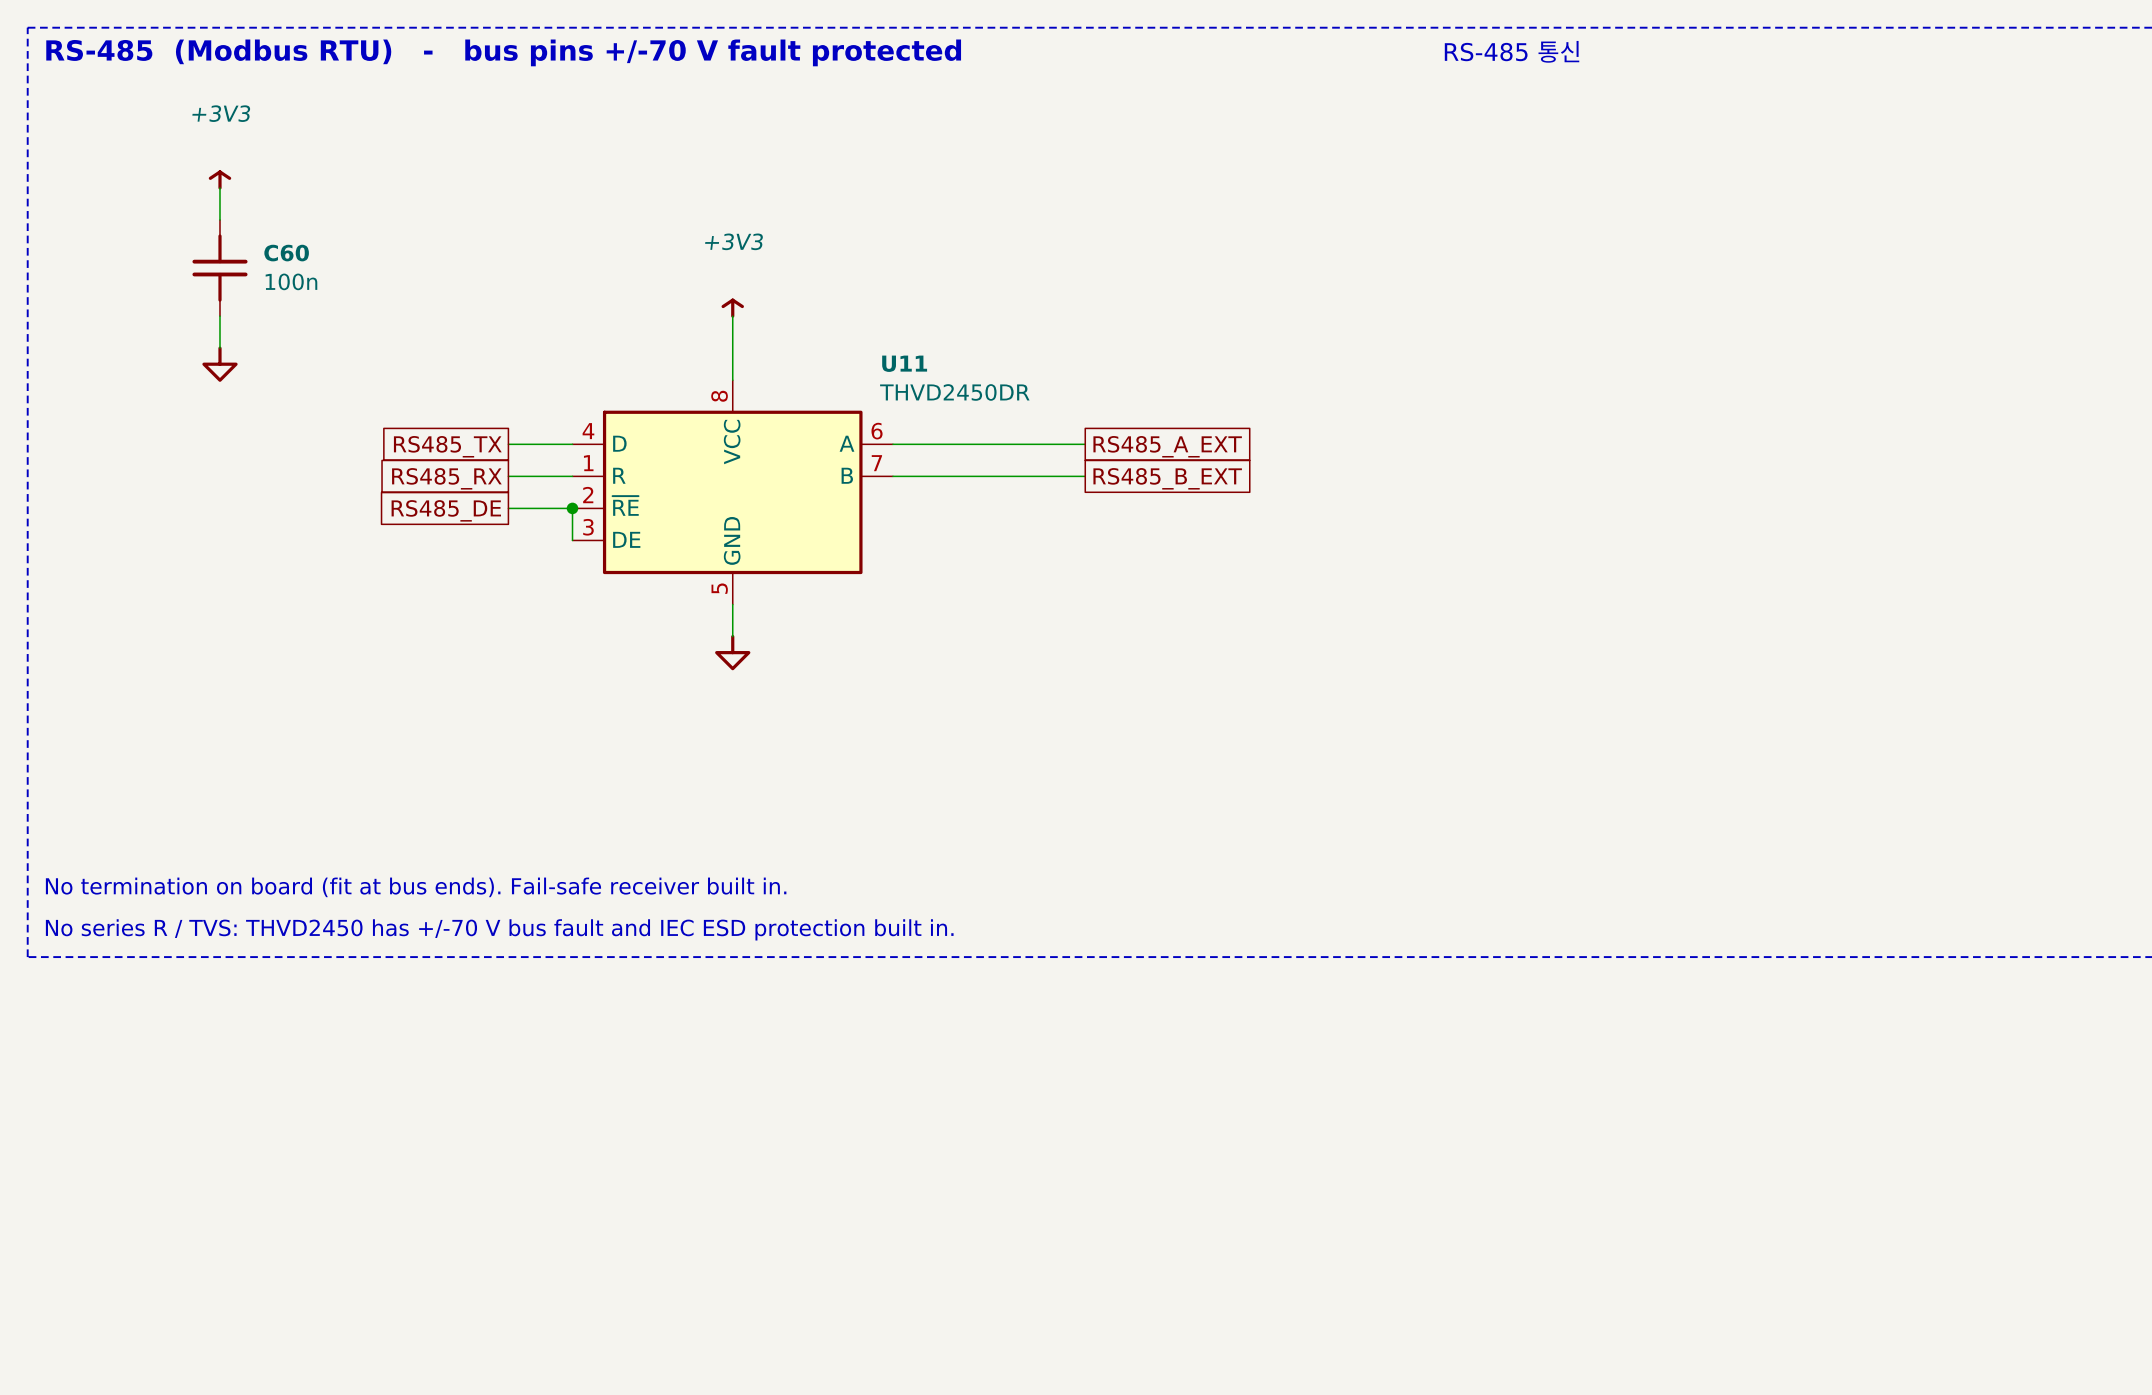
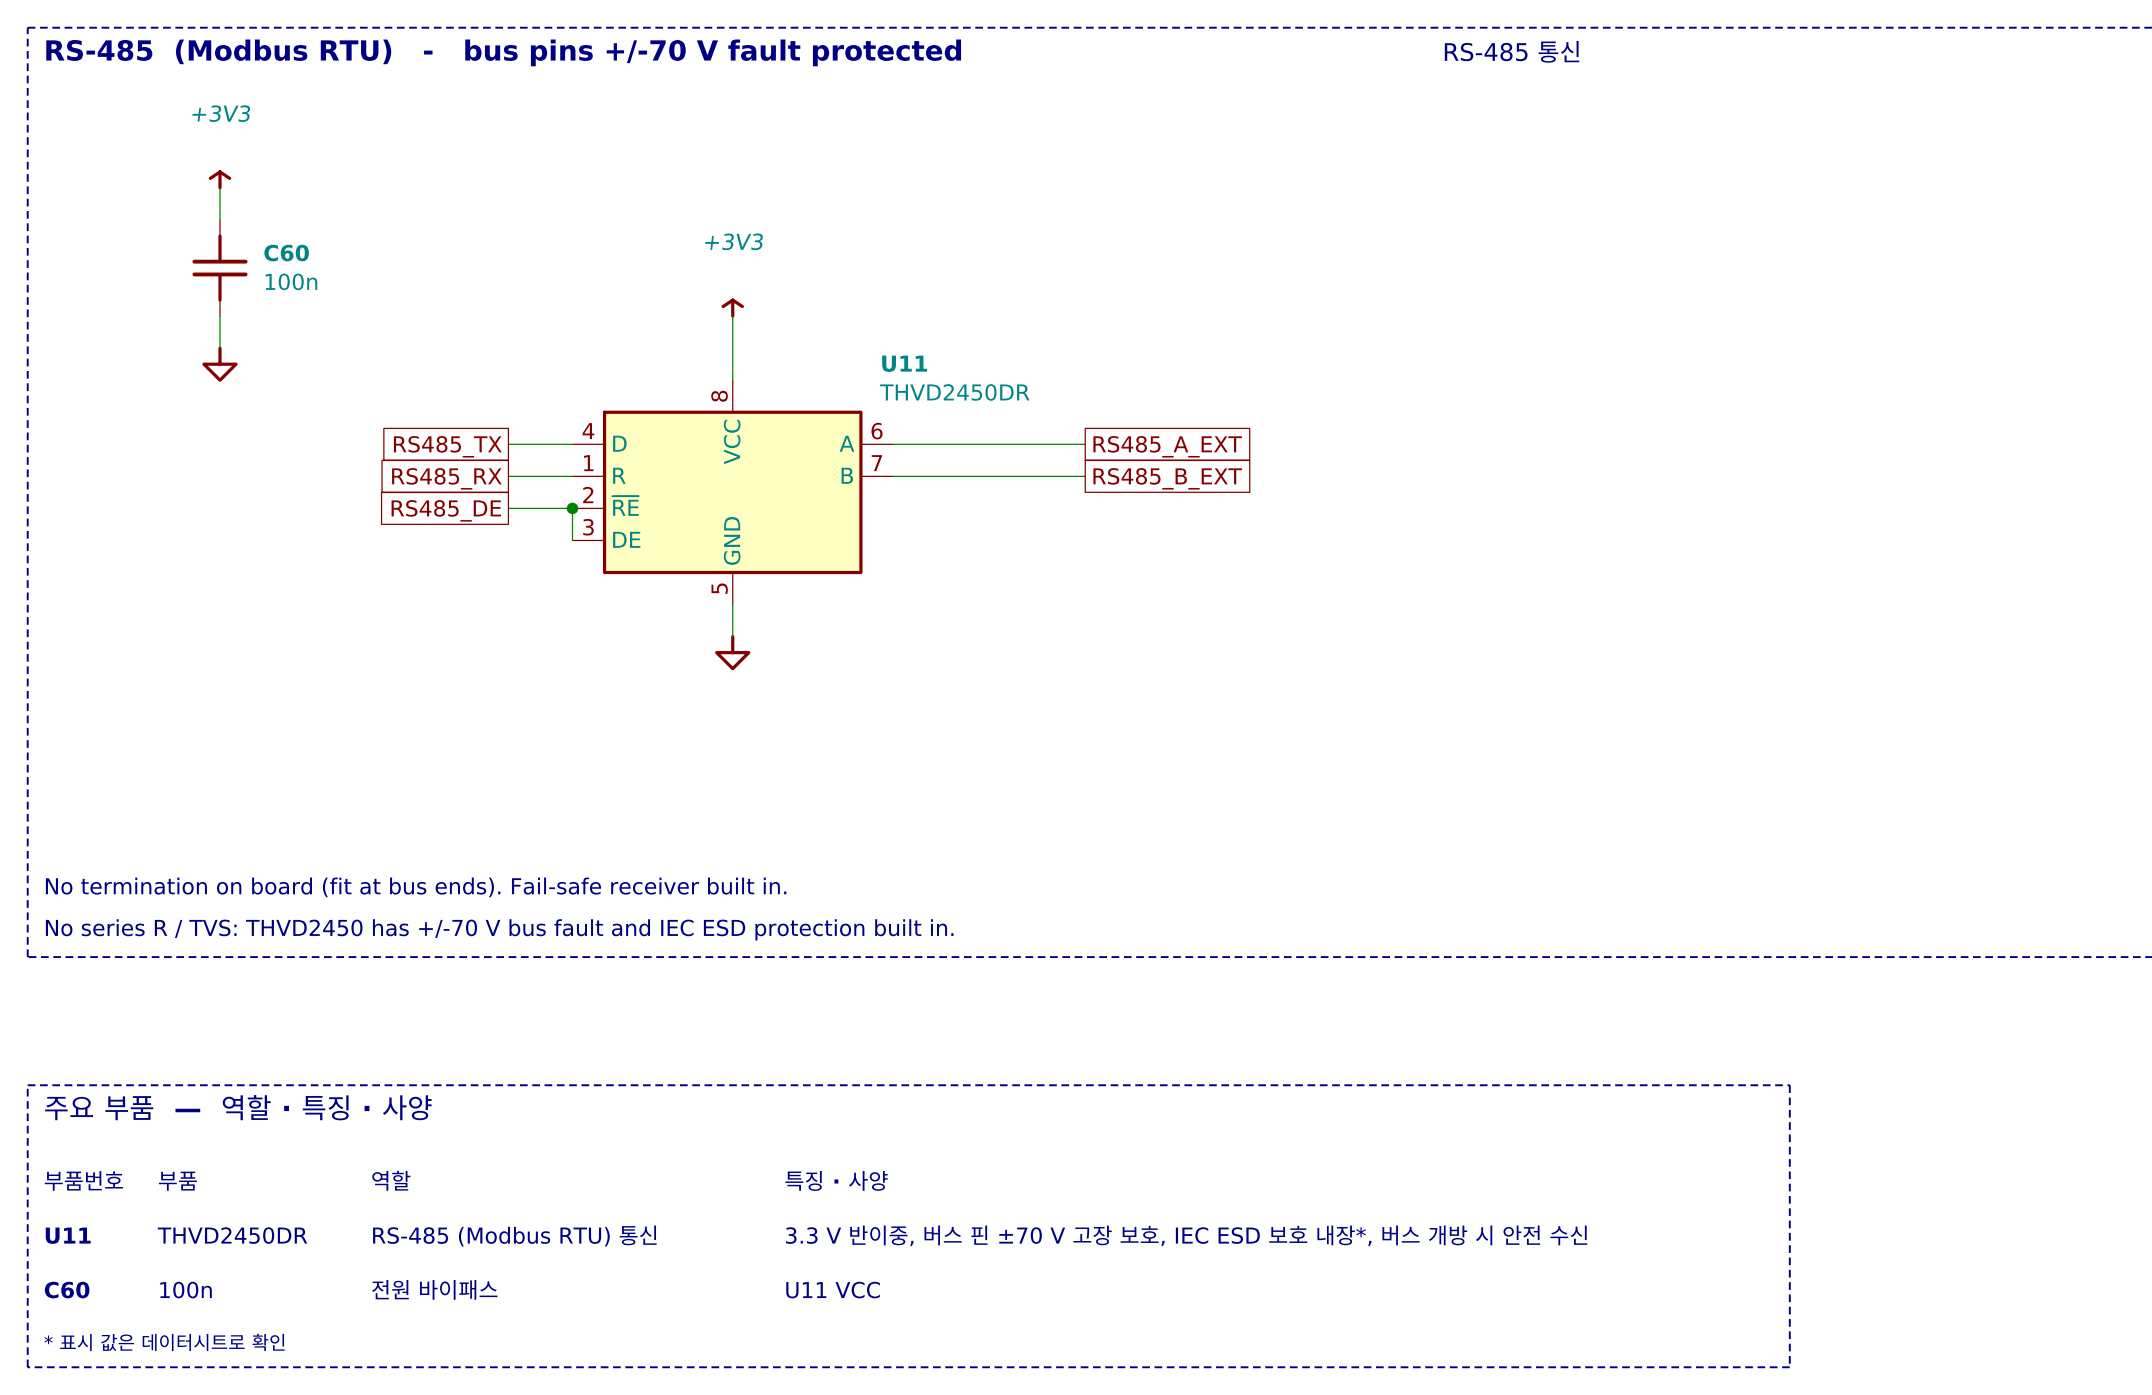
line: none -> (27, 1085) (1789, 1085) (1789, 1367) (27, 1367) (27, 1085)
text: none -> 주요 부품 — 역할 · 특징 · 사양 (238, 1107)
text: none -> 부품번호 (83, 1180)
text: none -> 역할 (391, 1180)
text: none -> 특징 · 사양 (836, 1180)
text: none -> 부품 (177, 1181)
text: none -> U11 (68, 1235)
text: none -> THVD2450DR (232, 1235)
text: none -> 3.3 V 반이중, 버스 핀 ±70 V 고장 보호, IEC ESD 보호 내장*, 버스 개방 시 안전 수신 (1186, 1235)
text: none -> RS-485 (Modbus RTU) 통신 (514, 1236)
text: none -> 전원 바이패스 (434, 1289)
text: none -> C60 (67, 1290)
text: none -> 100n (186, 1290)
text: none -> U11 VCC (833, 1290)
text: none -> * 표시 값은 데이터시트로 확인 (164, 1342)

